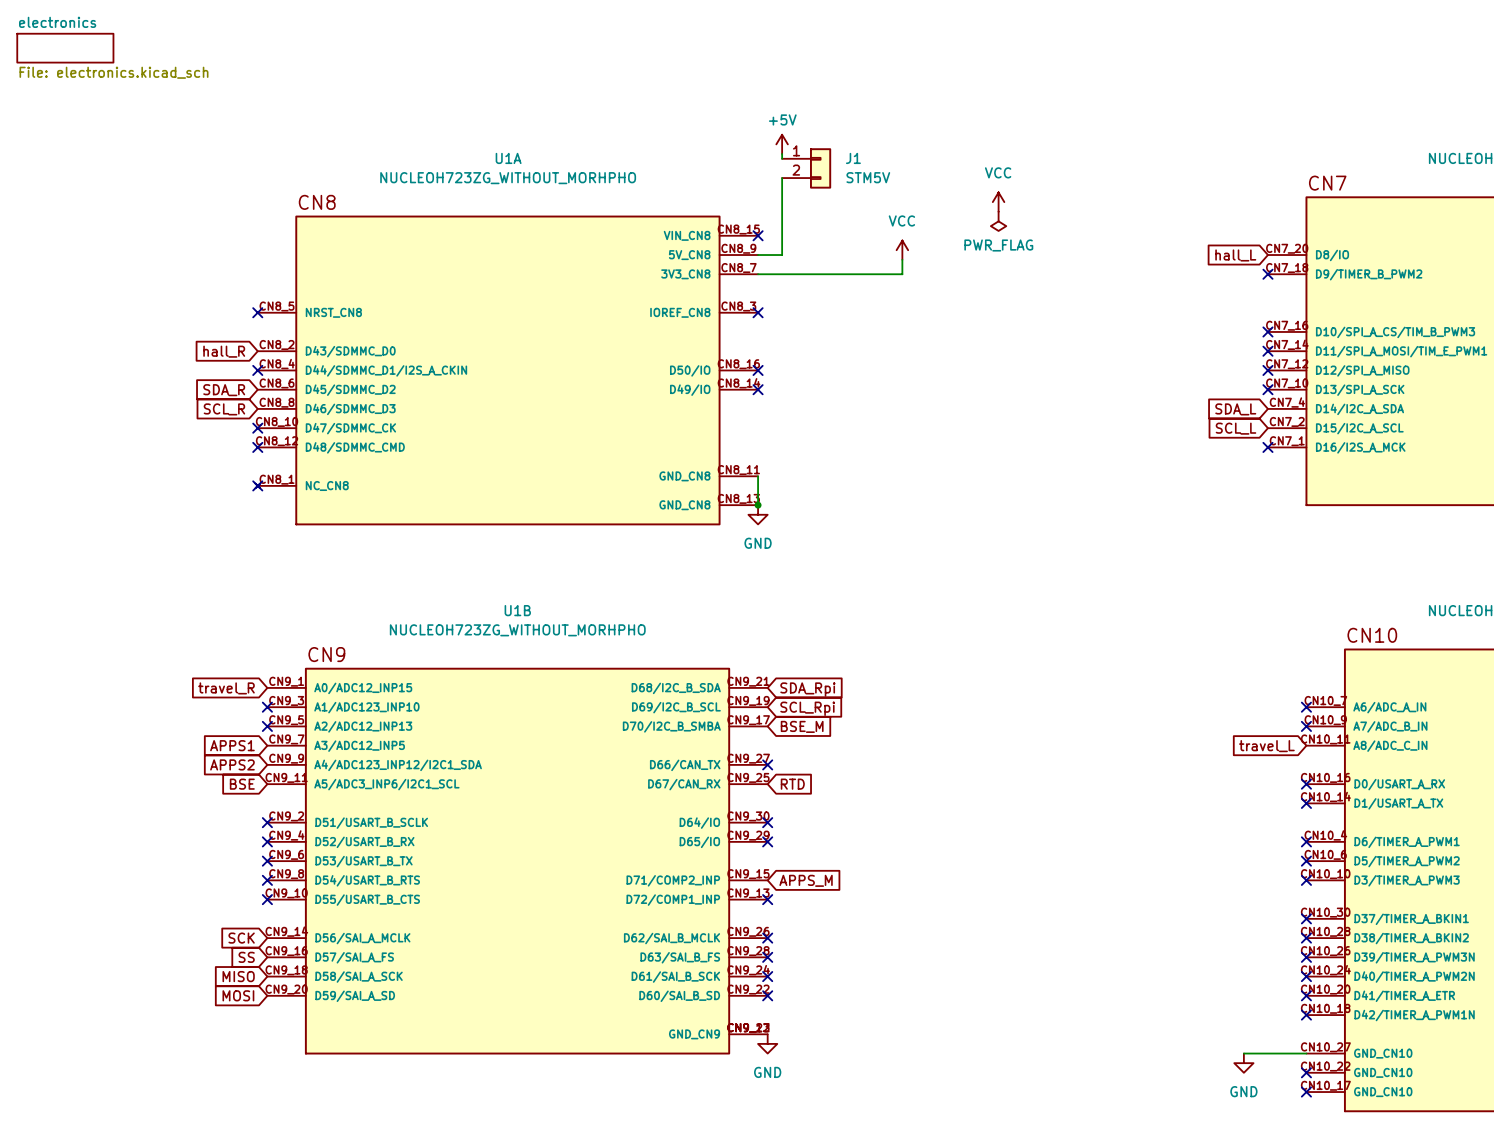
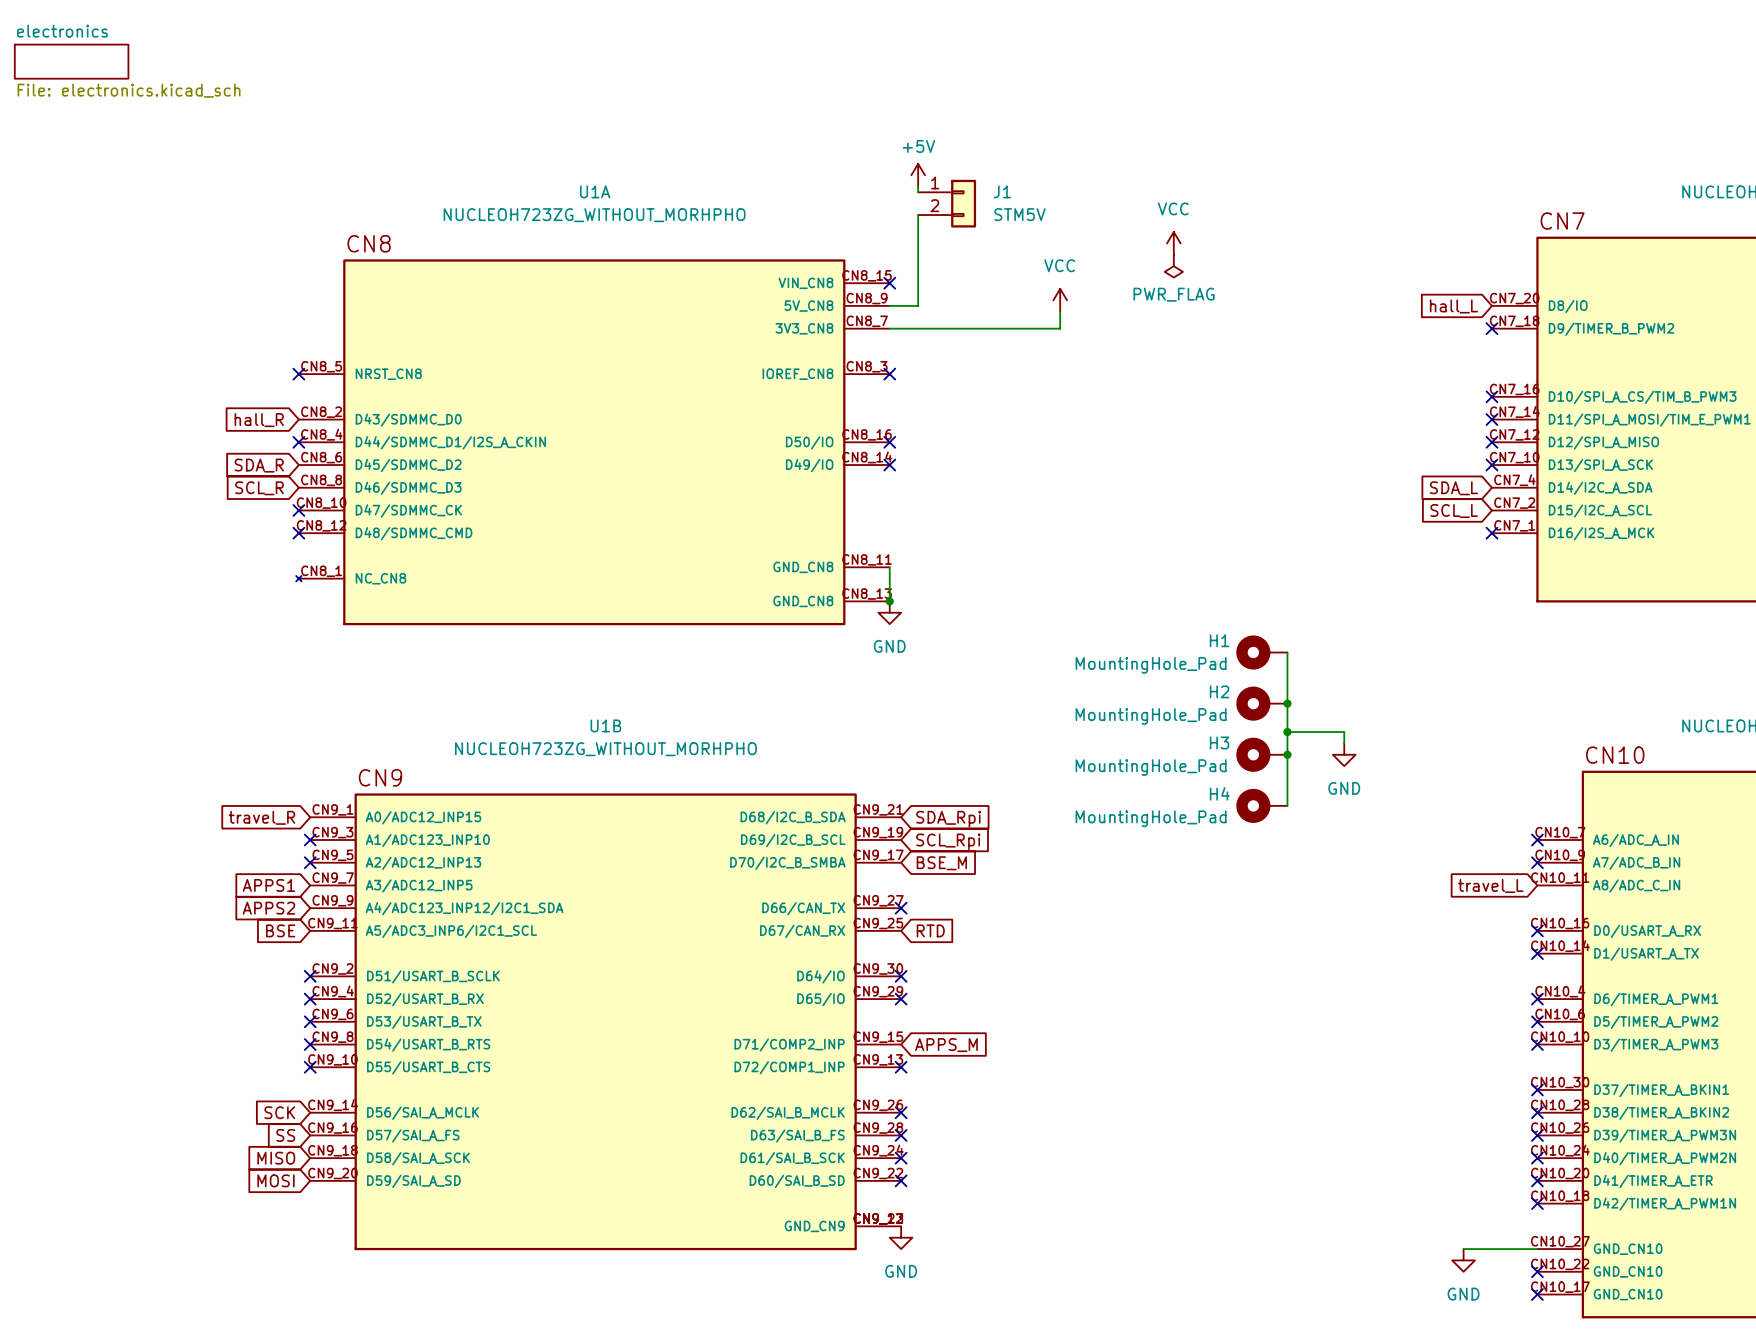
no-connect mark: (257, 485) -> none
H1: none -> MountingHole_Pad (1261, 652)
wire: none -> (1287, 652) (1287, 805)
H2: none -> MountingHole_Pad (1261, 703)
junction: none -> (1287, 703)
wire: none -> (1287, 732) (1344, 732) (1344, 743)
junction: none -> (1287, 732)
H3: none -> MountingHole_Pad (1261, 754)
junction: none -> (1287, 754)
power symbol: none -> GND (1344, 754)
H4: none -> MountingHole_Pad (1261, 805)

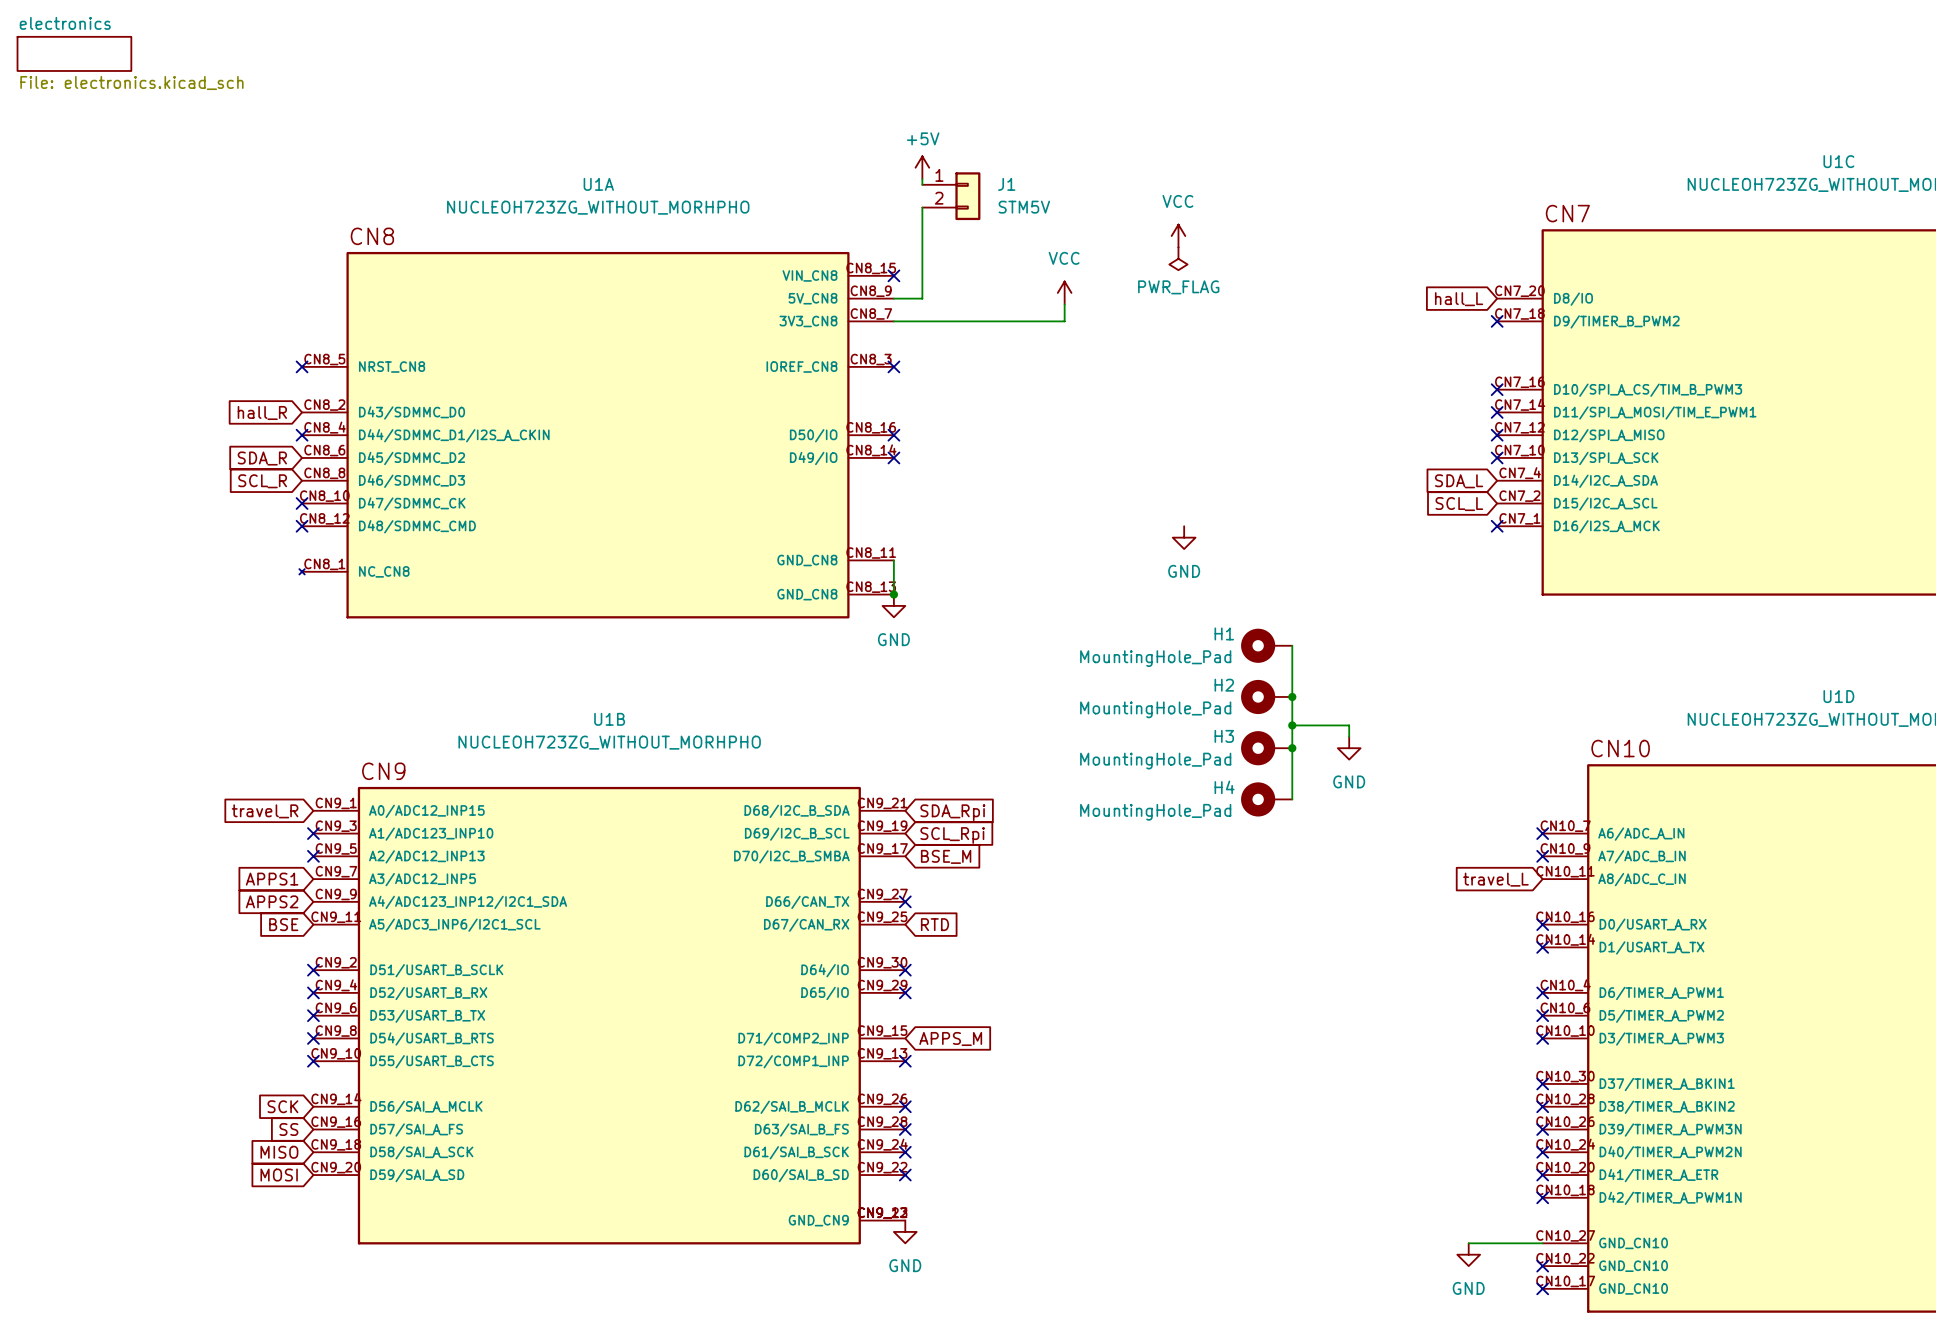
power symbol: none -> GND (1184, 537)

